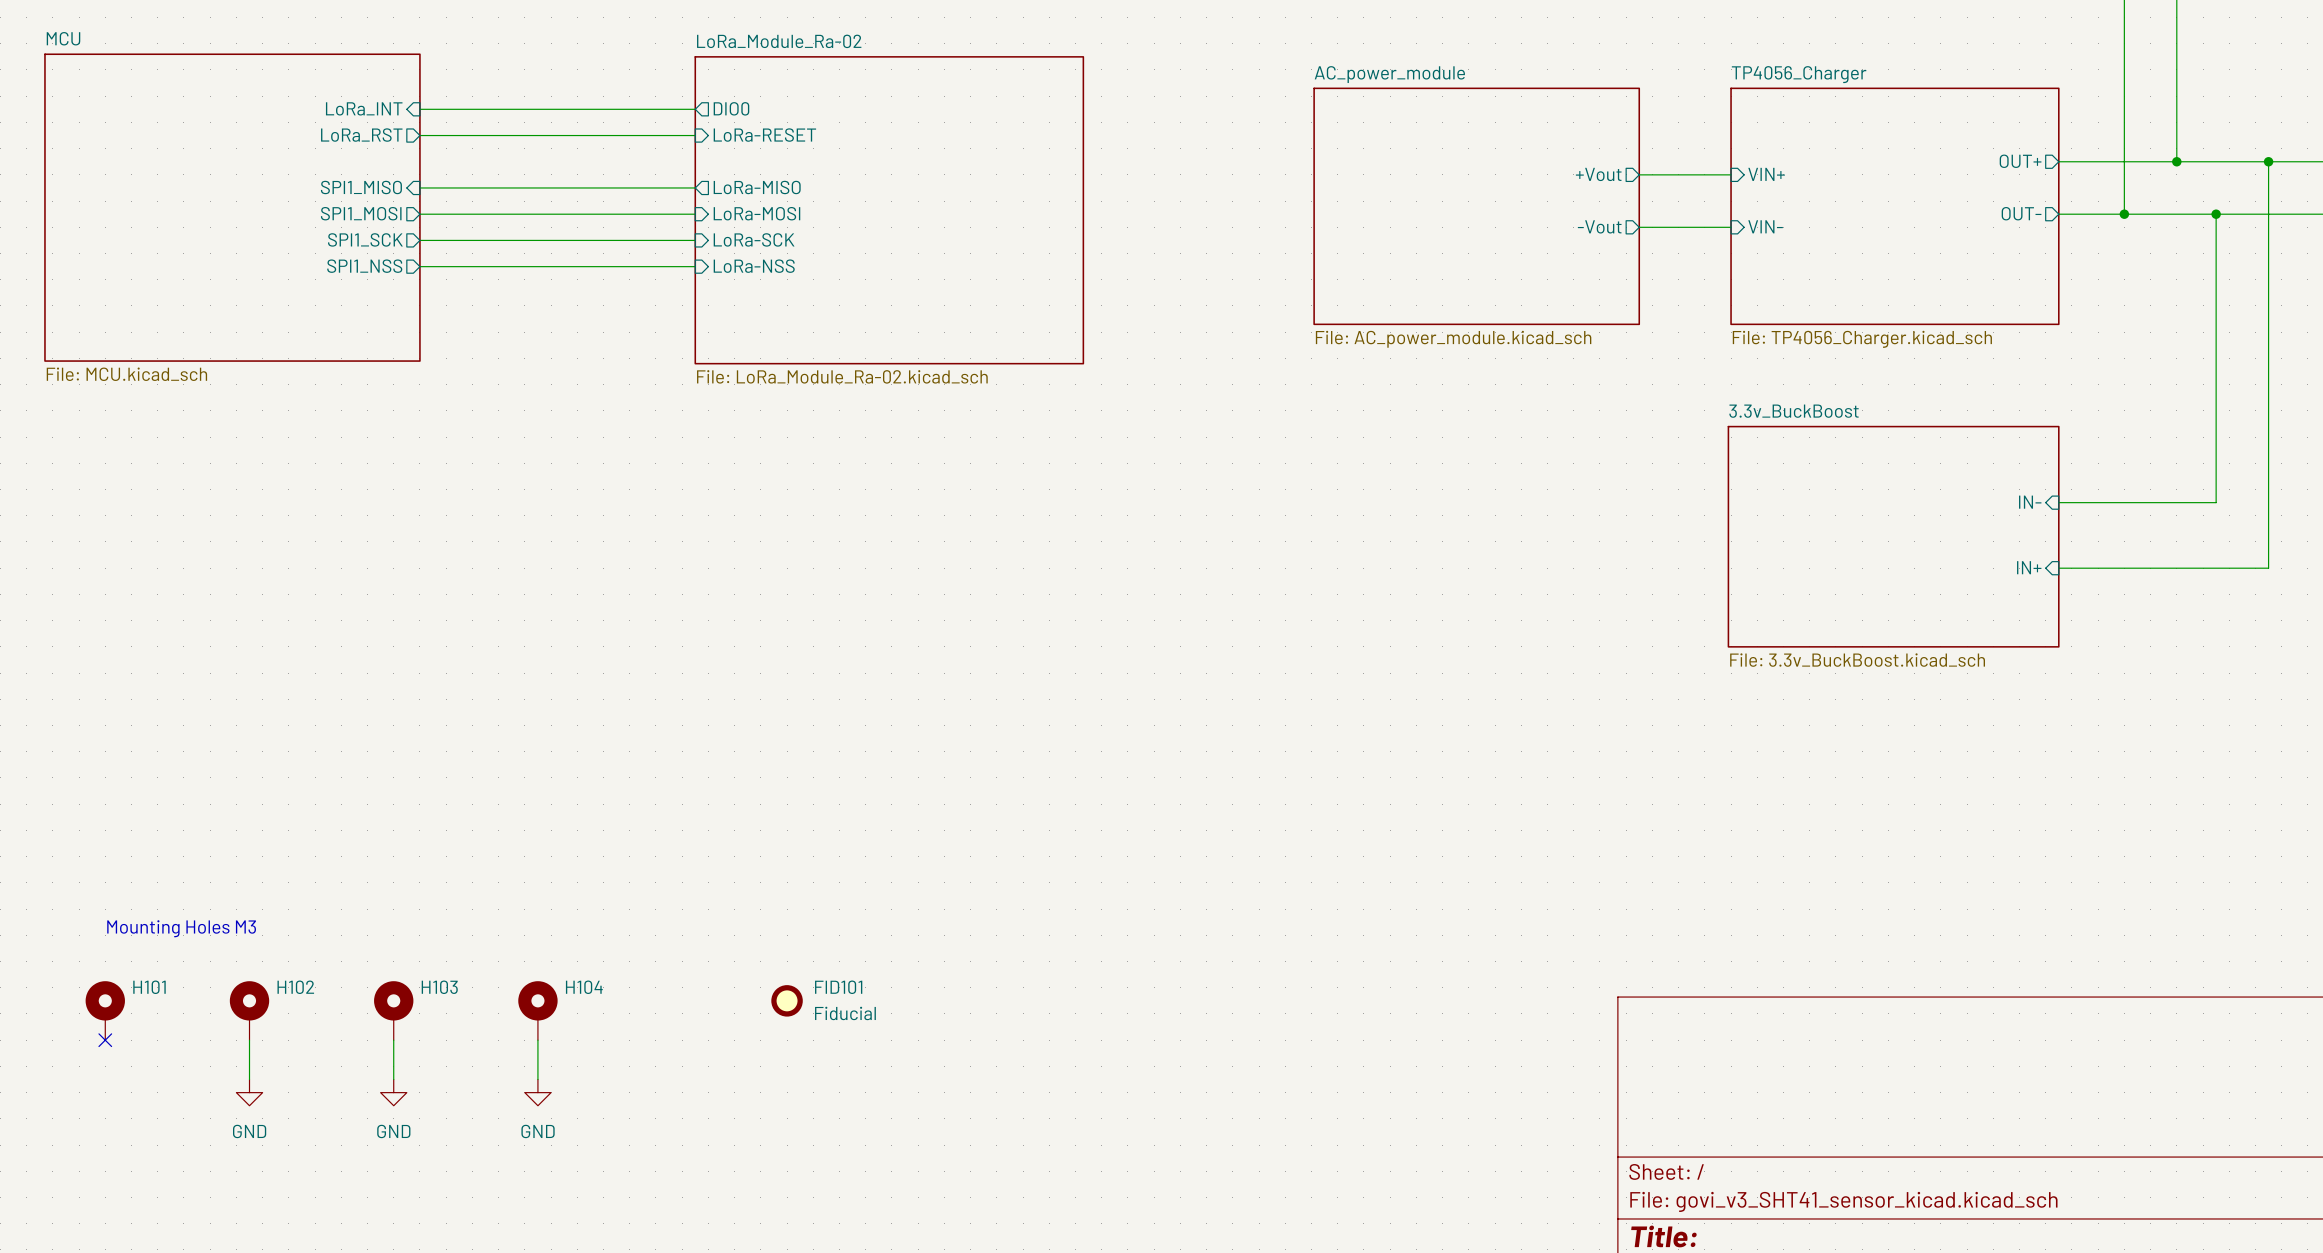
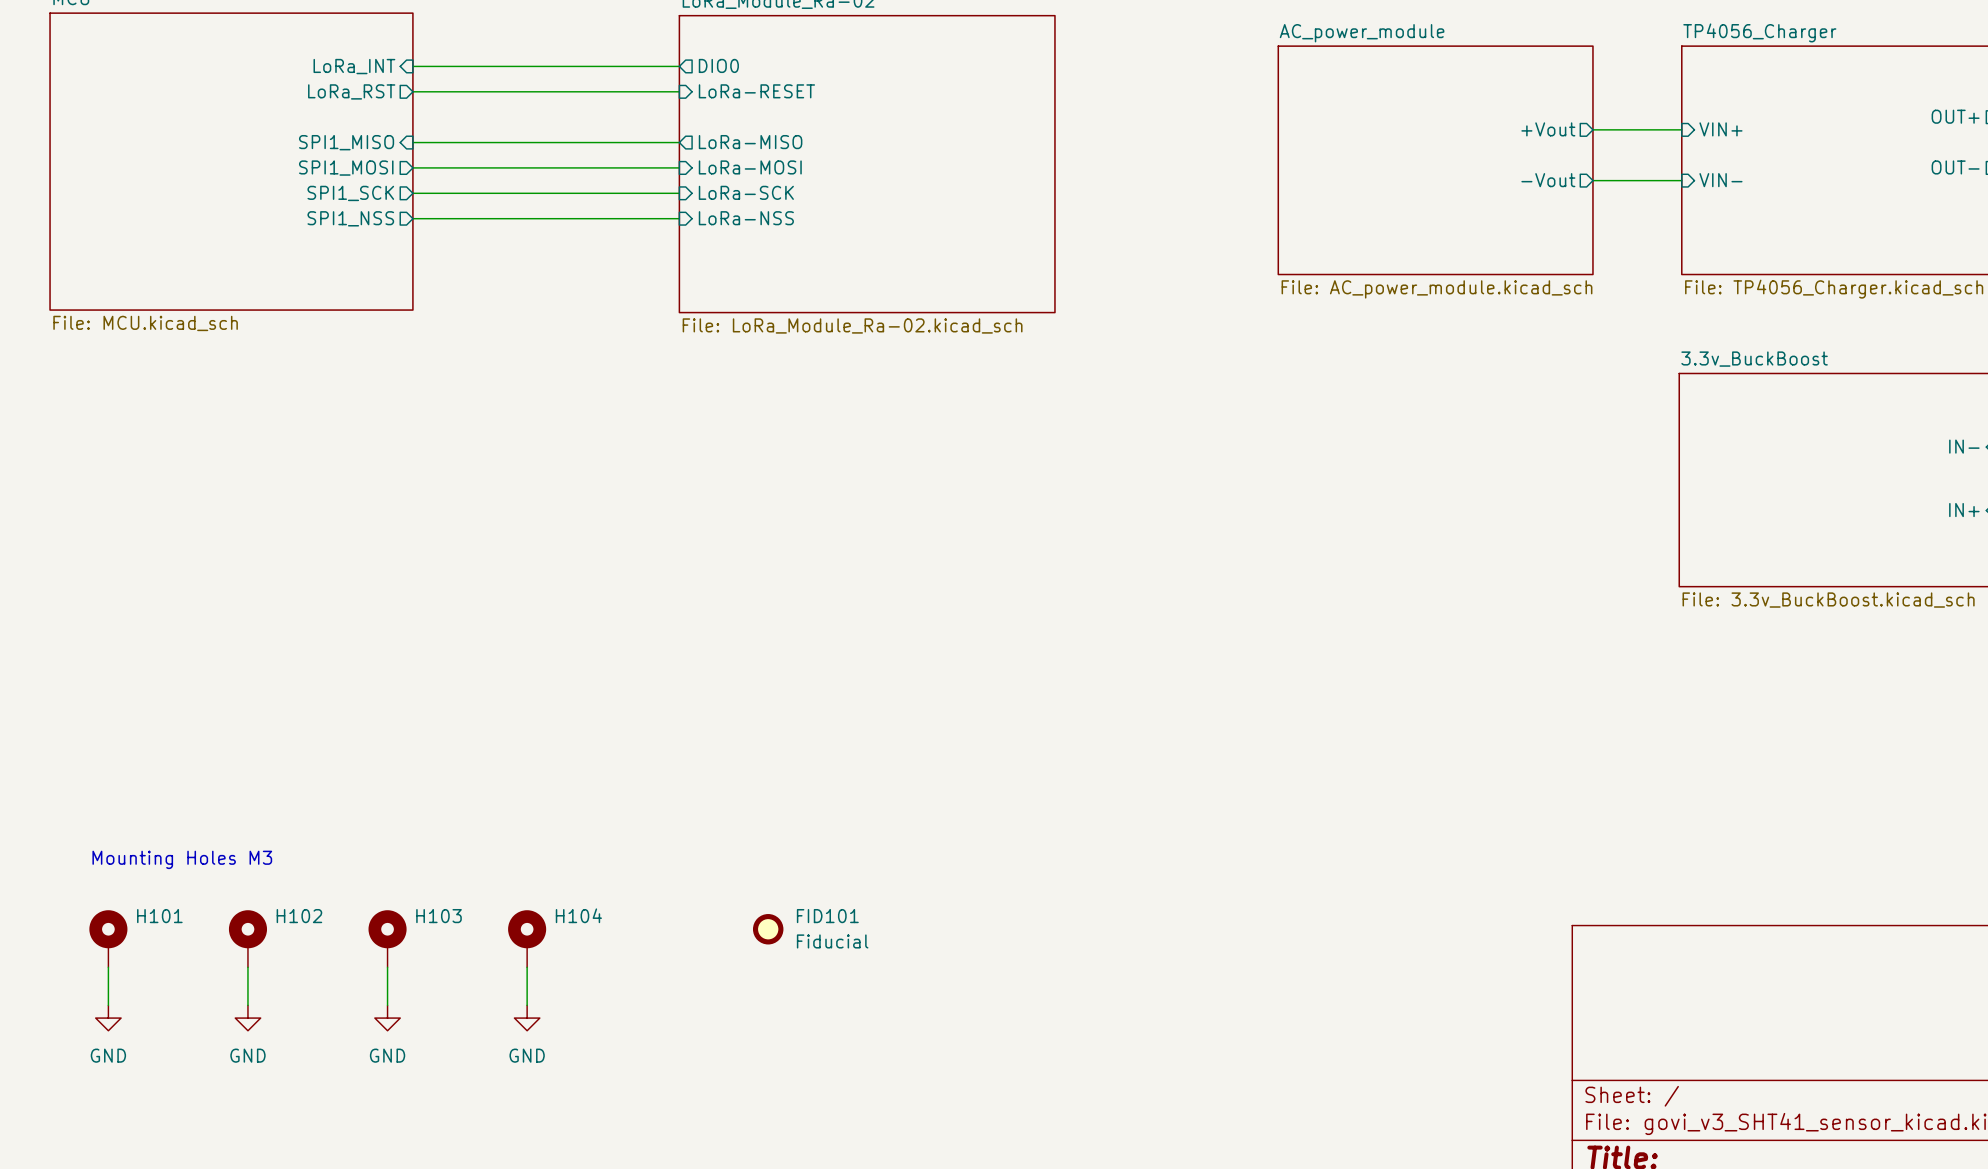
wire: none -> (108, 967) (108, 1005)
no-connect mark: (105, 1040) -> none
power symbol: none -> GND (108, 1018)

